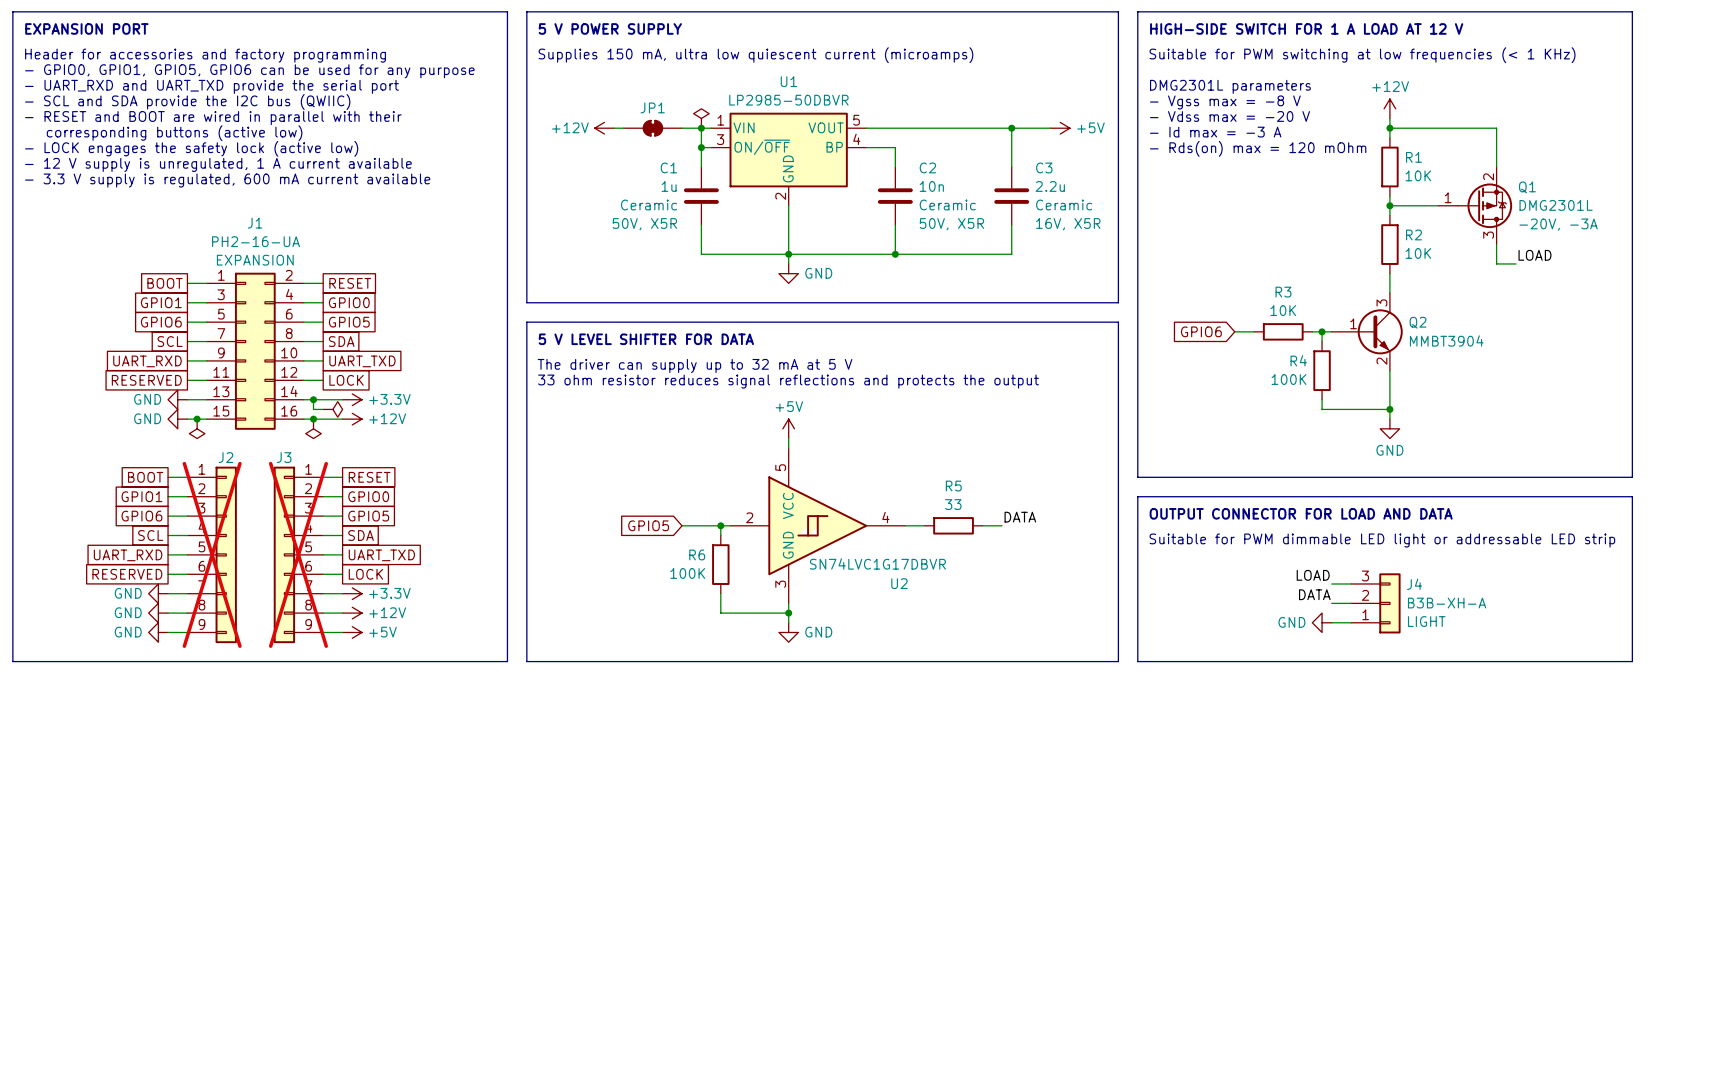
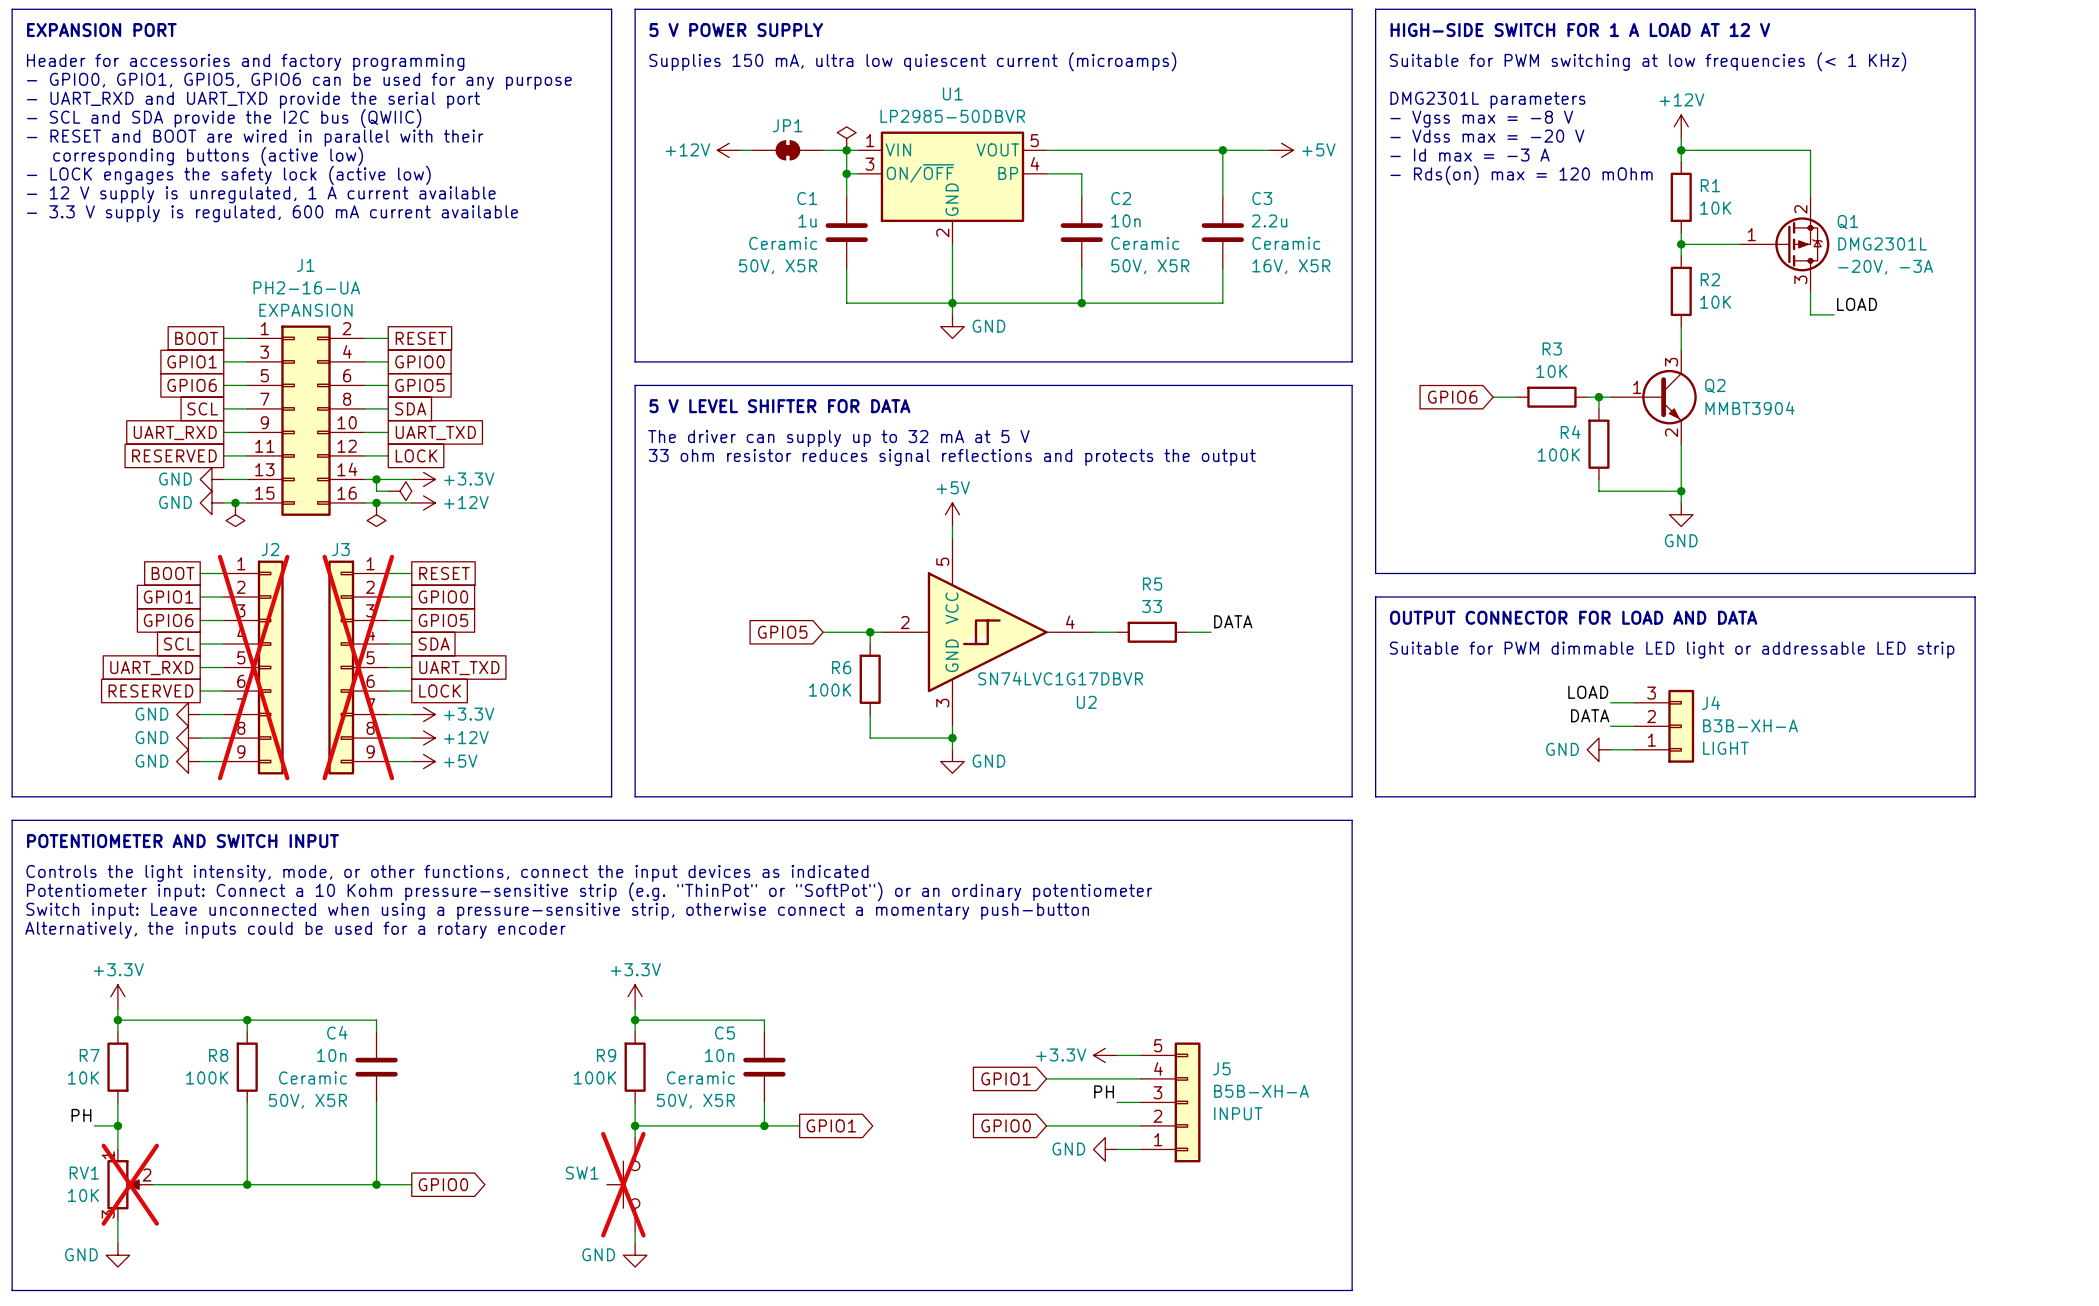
line: none -> (12, 820) (1352, 820) (1352, 1290) (12, 1290) (12, 820)
text: none -> POTENTIOMETER AND SWITCH INPUT (183, 841)
text: none -> Controls the light intensity, mode, or other functions, connect the input devices as indicated (447, 873)
text: none -> Potentiometer input: Connect a 10 Kohm pressure-sensitive strip (e.g. "ThinPot" or "SoftPot") or an ordinary potentiometer (589, 891)
text: none -> Switch input: Leave unconnected when using a pressure-sensitive strip, otherwise connect a momentary push-button (557, 911)
text: none -> Alternatively, the inputs could be used for a rotary encoder (295, 930)
power symbol: none -> +3.3V (117, 996)
power symbol: none -> +3.3V (635, 996)
wire: none -> (117, 1008) (117, 1031)
wire: none -> (635, 1008) (635, 1031)
wire: none -> (117, 1020) (376, 1020) (376, 1031)
junction: none -> (117, 1020)
wire: none -> (247, 1020) (247, 1031)
junction: none -> (247, 1020)
wire: none -> (635, 1020) (764, 1020) (764, 1031)
junction: none -> (635, 1020)
power symbol: none -> +3.3V (1105, 1055)
wire: none -> (1117, 1055) (1140, 1055)
R7: none -> 10K (117, 1067)
R8: none -> 100K (247, 1067)
C4: none -> 10n (376, 1067)
R9: none -> 100K (635, 1067)
C5: none -> 10n (764, 1067)
global label: none -> GPIO1 (1006, 1078)
wire: none -> (1046, 1078) (1140, 1078)
label: none -> PH (1104, 1091)
wire: none -> (117, 1102) (117, 1149)
wire: none -> (247, 1102) (247, 1184)
wire: none -> (376, 1102) (376, 1184)
wire: none -> (635, 1102) (635, 1137)
wire: none -> (764, 1102) (764, 1125)
wire: none -> (1117, 1102) (1140, 1102)
J5: none -> B5B-XH-A (1170, 1102)
label: none -> PH (81, 1115)
wire: none -> (94, 1125) (117, 1125)
junction: none -> (117, 1125)
wire: none -> (635, 1125) (799, 1125)
junction: none -> (635, 1125)
junction: none -> (764, 1125)
global label: none -> GPIO1 (831, 1125)
global label: none -> GPIO0 (1006, 1125)
wire: none -> (1046, 1125) (1140, 1125)
power symbol: none -> GND (1105, 1149)
wire: none -> (1117, 1149) (1140, 1149)
RV1: none -> 10K (130, 1184)
wire: none -> (153, 1184) (411, 1184)
junction: none -> (247, 1184)
junction: none -> (376, 1184)
global label: none -> GPIO0 (443, 1184)
SW1: none -> (623, 1184)
wire: none -> (117, 1219) (117, 1243)
wire: none -> (635, 1231) (635, 1243)
power symbol: none -> GND (117, 1255)
power symbol: none -> GND (635, 1255)

